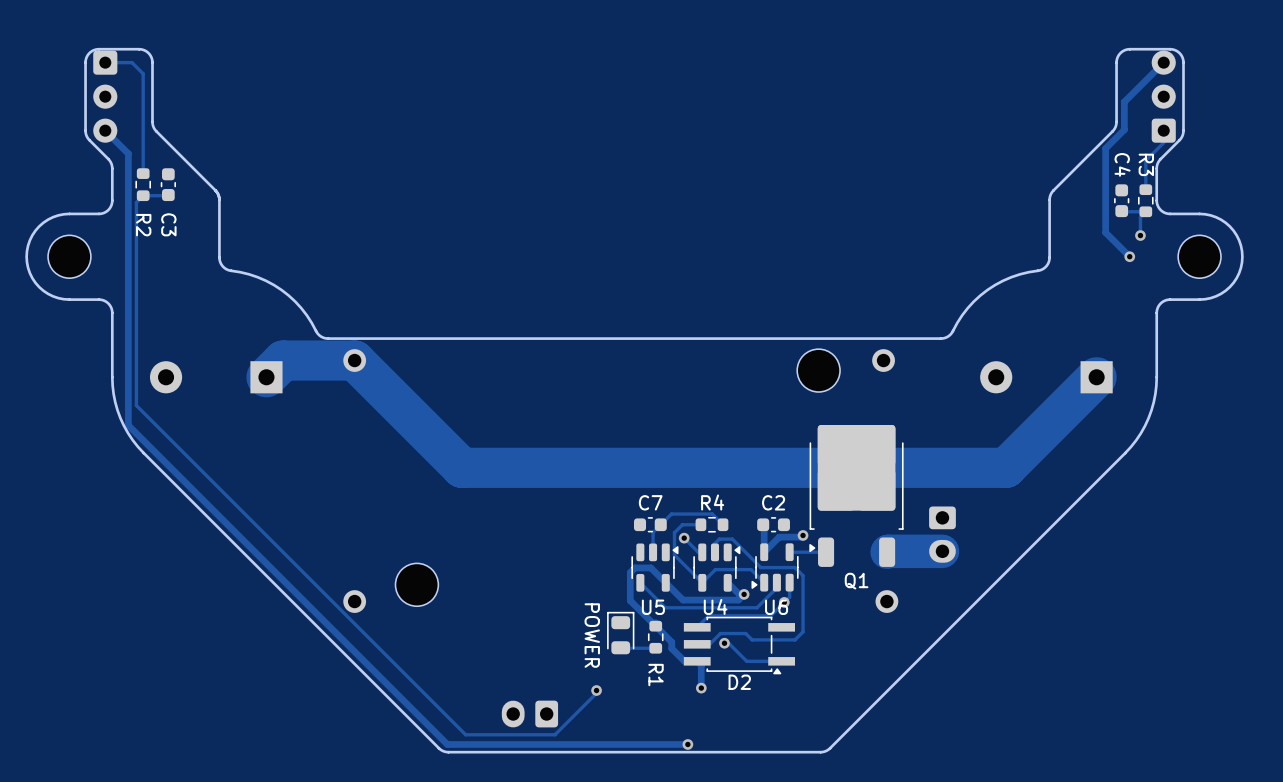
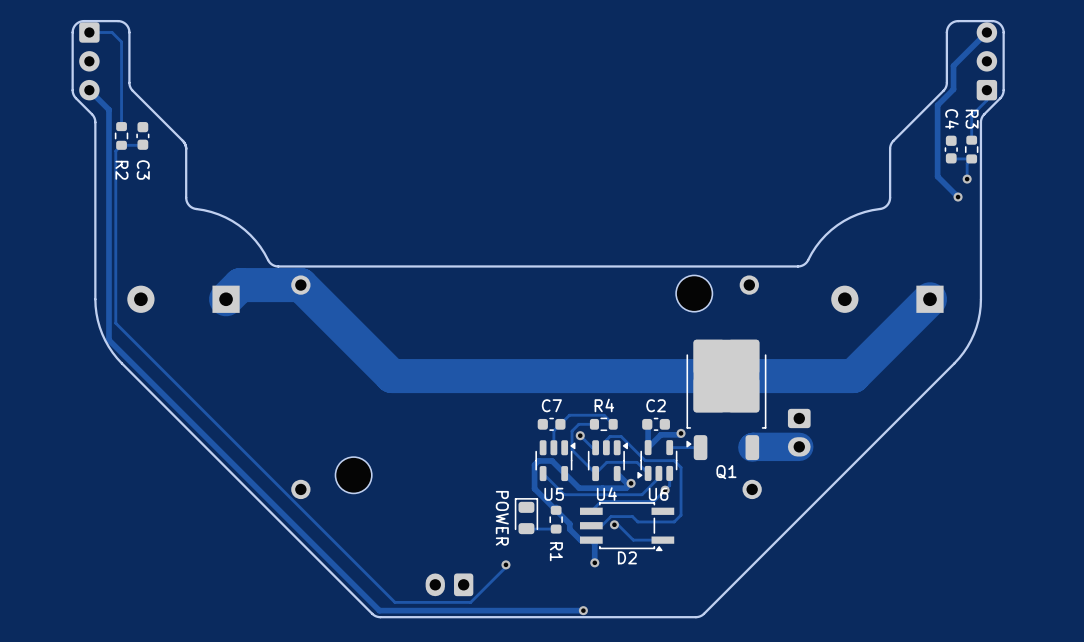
board edge: (112, 200) (110, 207) (103, 213) (63, 214) (48, 219) (32, 235) (26, 256) (32, 278) (48, 293) (63, 299) (102, 300) (109, 304) (112, 312) -> (95, 149) (95, 244)
board edge: (1156, 200) (1159, 208) (1165, 213) (1205, 214) (1220, 219) (1236, 235) (1242, 256) (1236, 278) (1220, 293) (1205, 299) (1166, 300) (1159, 304) (1156, 312) -> (980, 149) (980, 244)
part: (69, 256) -> none
part: (1199, 256) -> none

